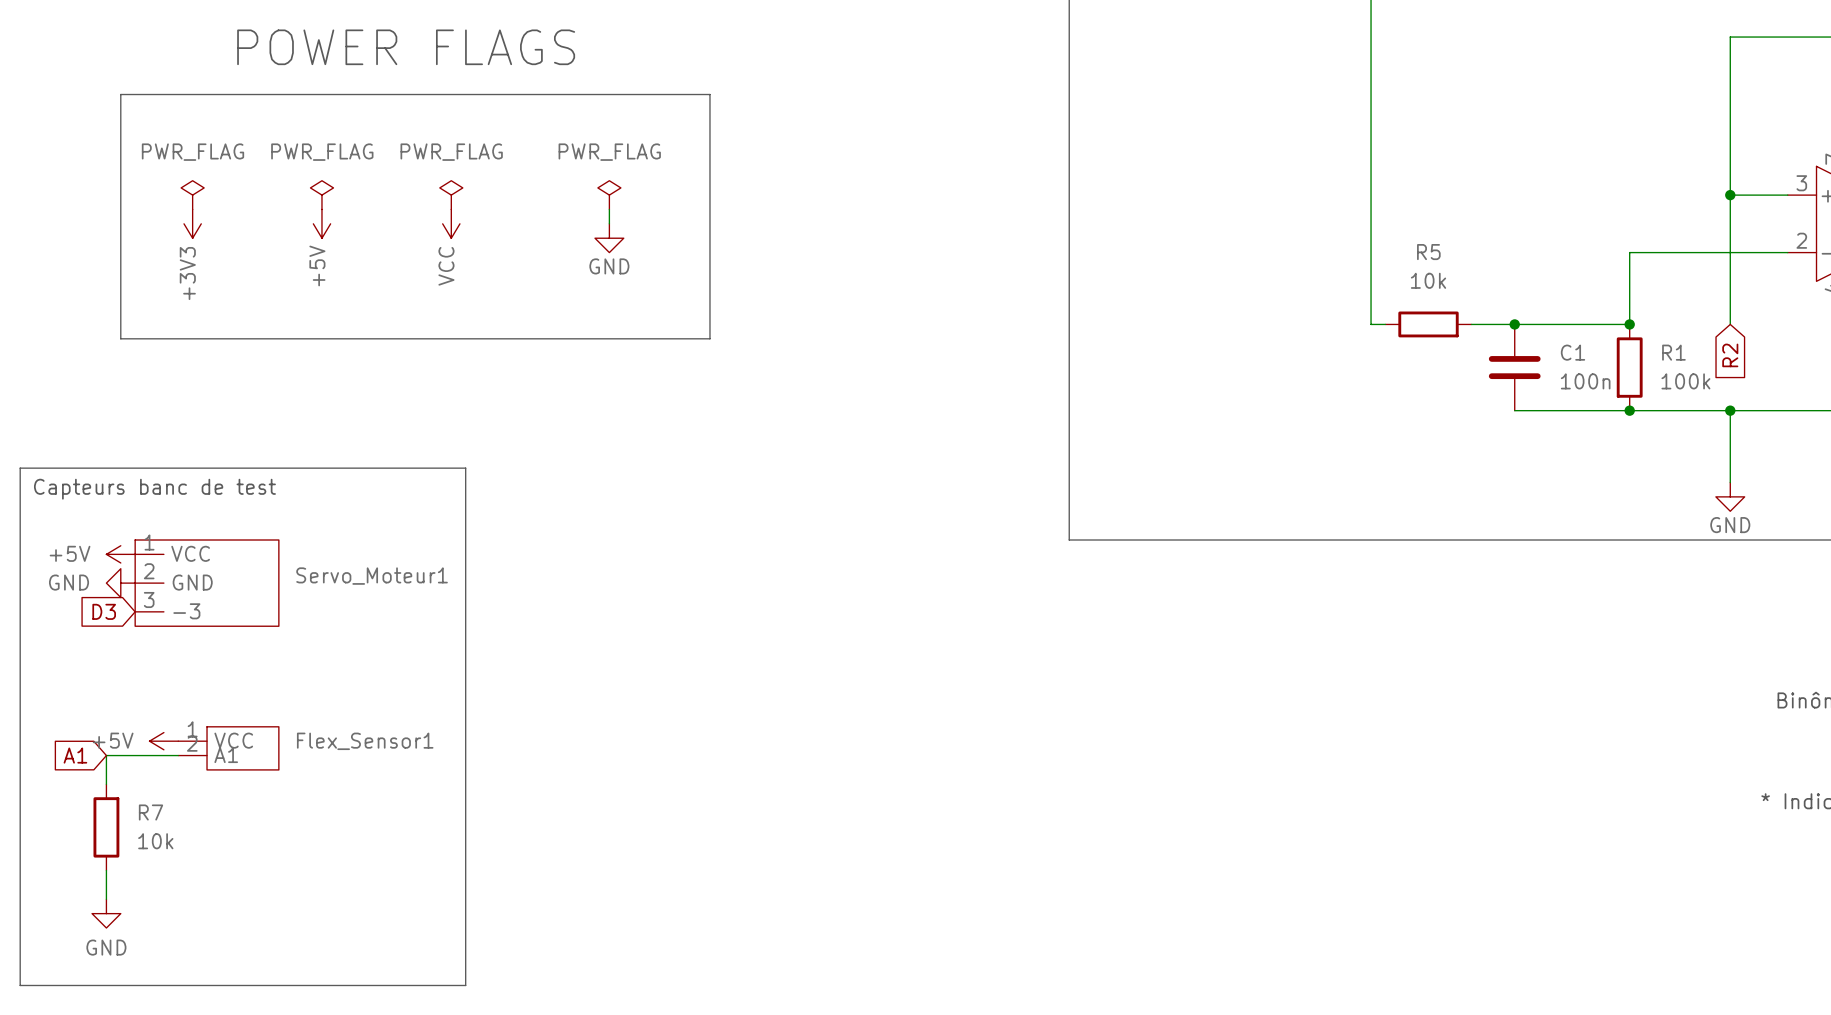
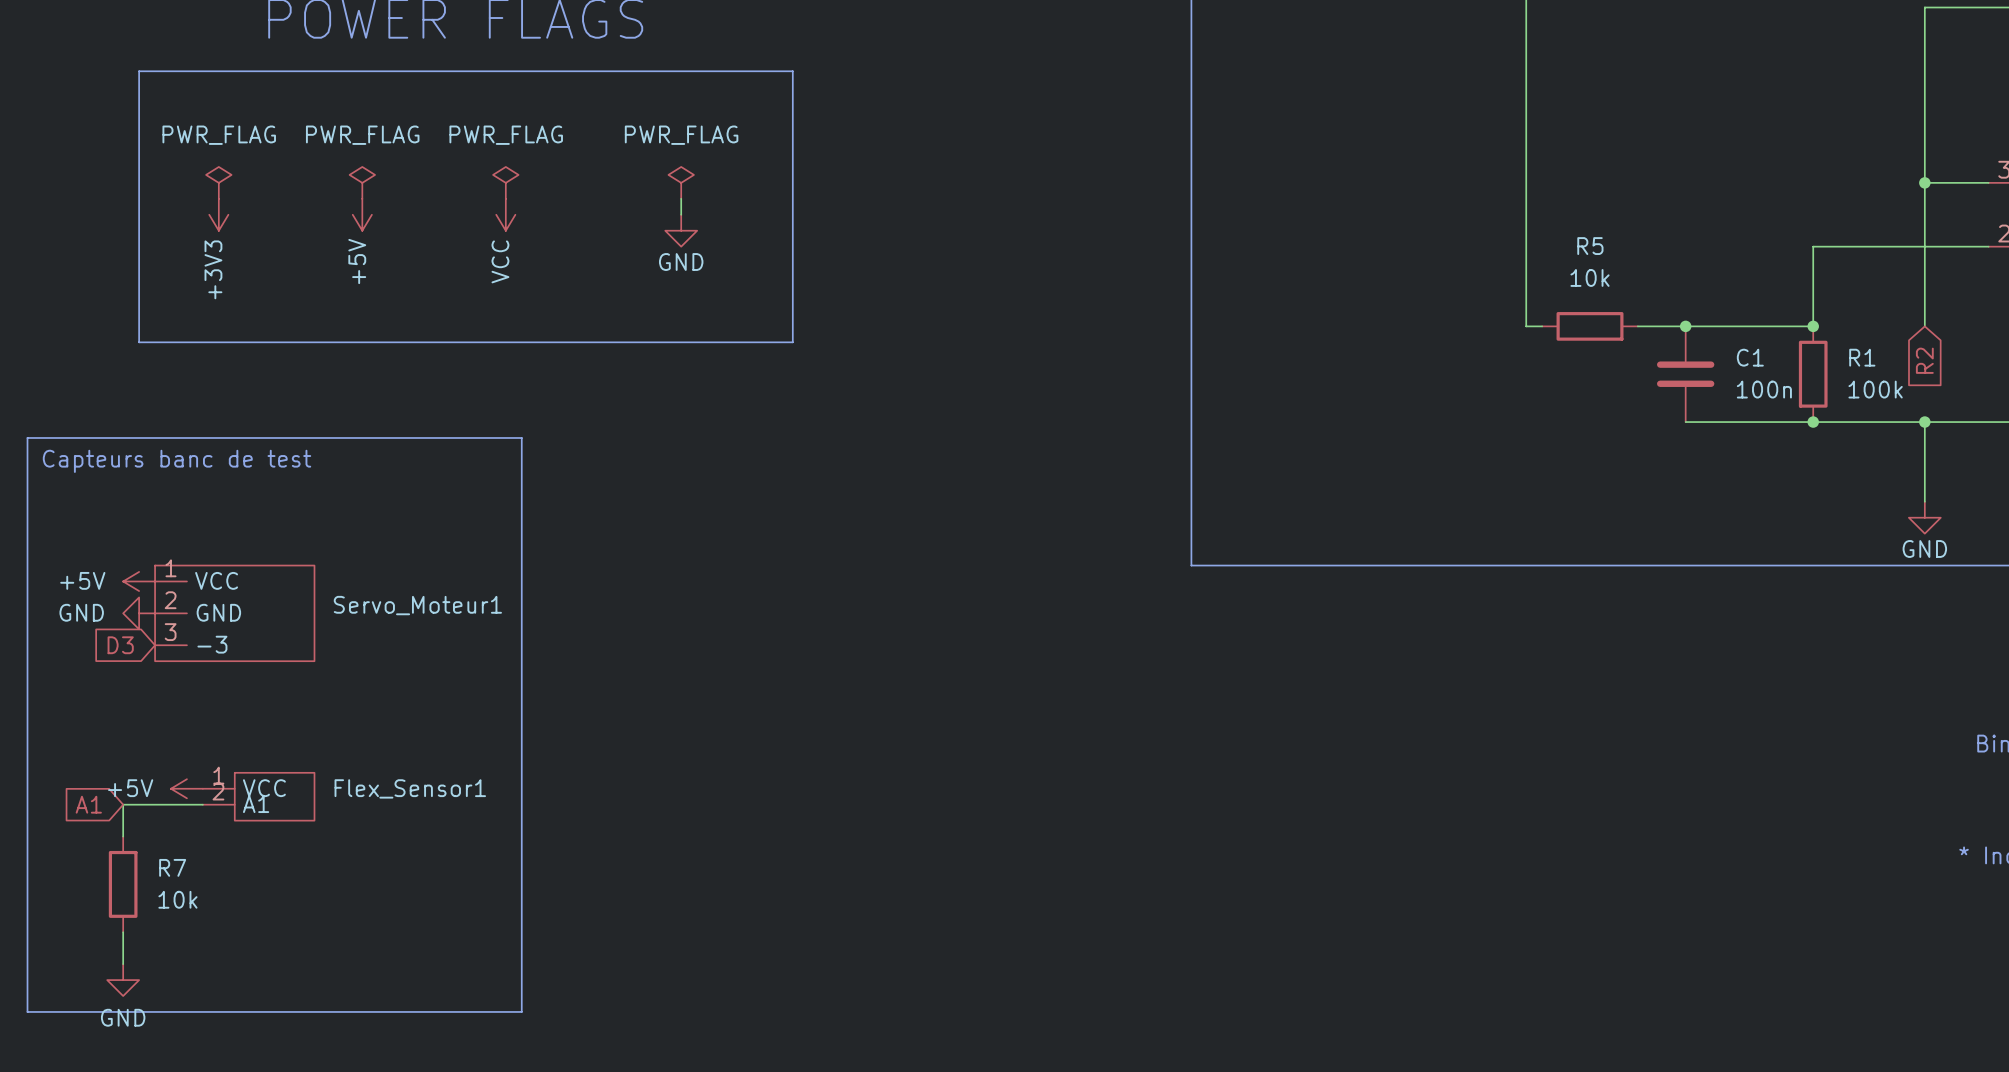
line: (20, 468) (465, 468) -> (27, 485) (27, 437) (521, 437) (521, 485)
text position: Capteurs banc de test (154, 489) -> Capteurs banc de test (177, 461)
line: (20, 942) (20, 985) (465, 985) (465, 942) -> (27, 1011) (521, 1011)

